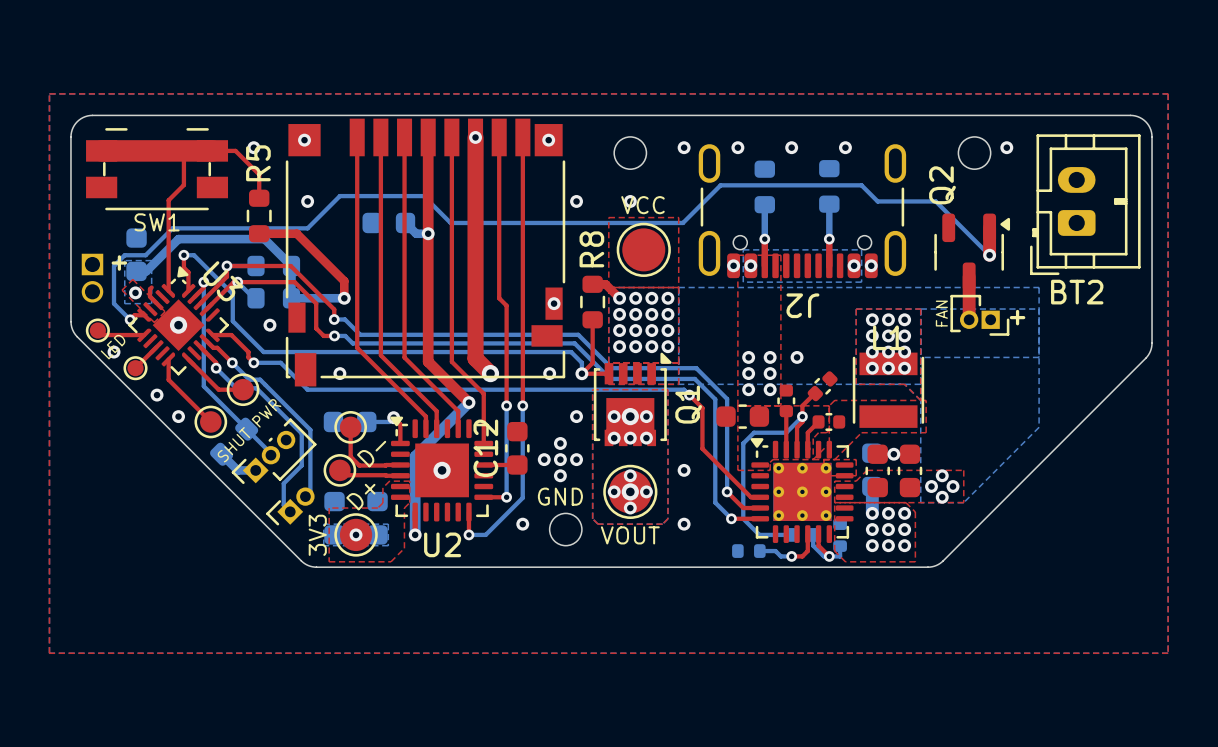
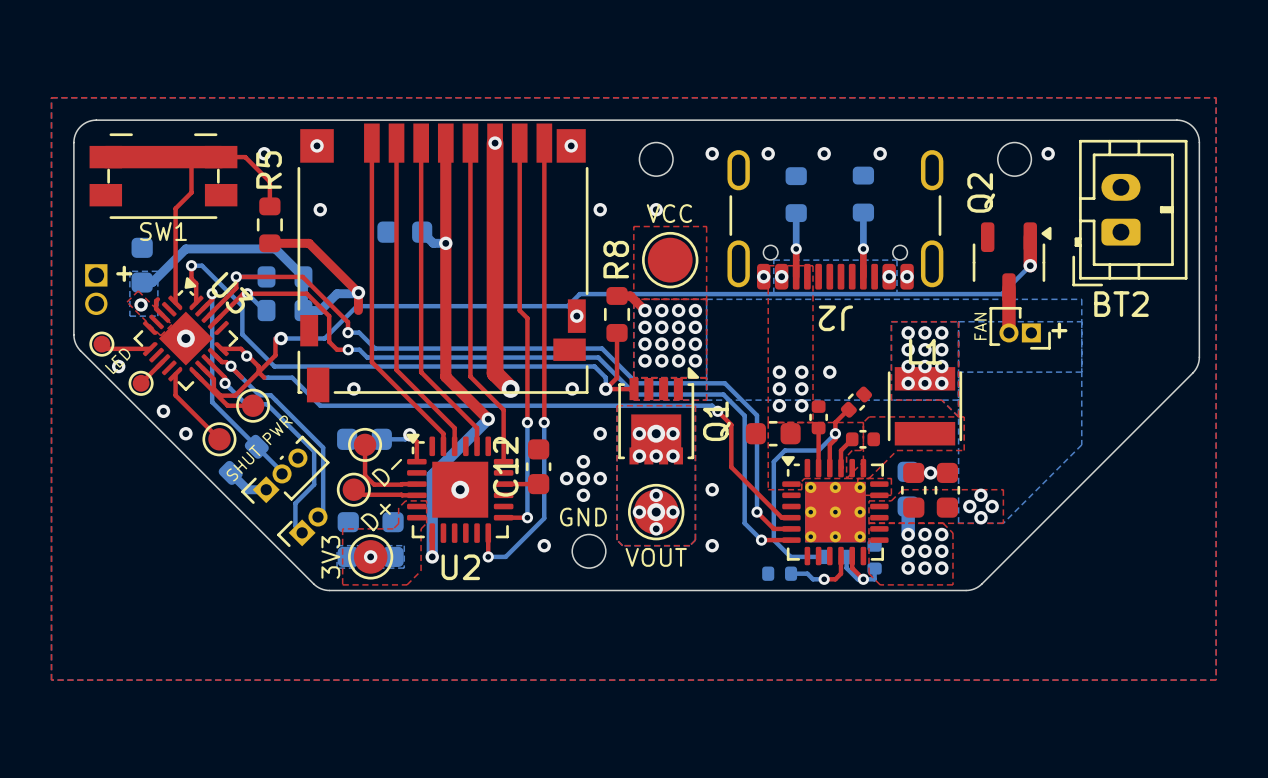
bottom track: (989, 255) (935, 201) (877, 201) (861, 185) (720, 185) (682, 222) (450, 222) (423, 196) (339, 196) (307, 228) (172, 228) (145, 255) (124, 255) (114, 266) (114, 303) (130, 319) -> (1030, 265) (1001, 294) (579, 294) (567, 306) (356, 306) (324, 338) (275, 338)
bottom track: (307, 298) (344, 298) -> (320, 310) (337, 293) (358, 292)
via position: (344, 298) -> (358, 292)
top track: (144, 315) (134, 315) (130, 319) -> none
via: (130, 319) -> none
top track: none -> (275, 338) (275, 355) (235, 395) (220, 395) (213, 388) (213, 379) (202, 367)
via: none -> (246, 356)
via: none -> (230, 366)
via: (232, 362) -> none
via: (253, 362) -> none

